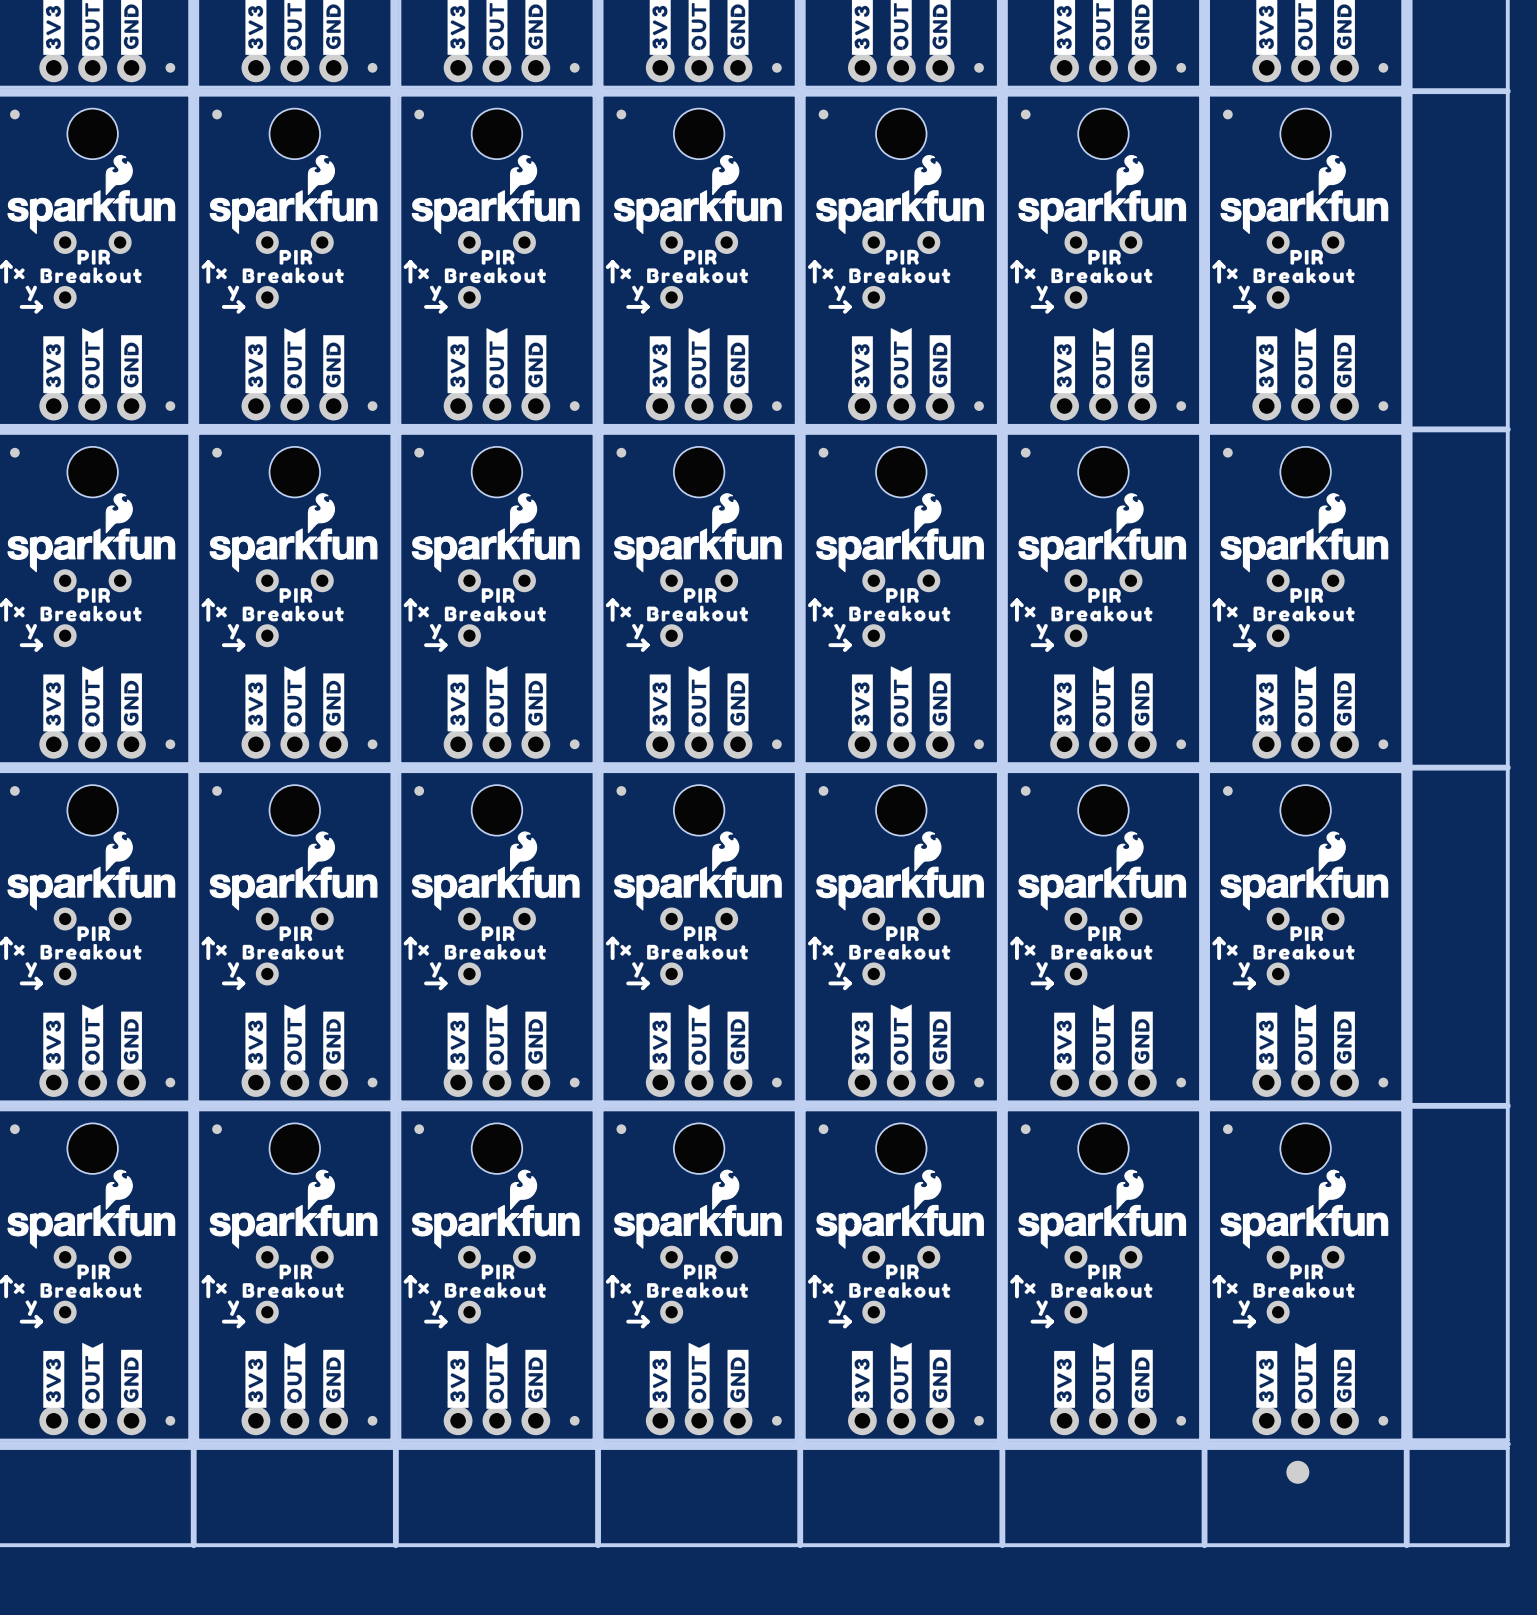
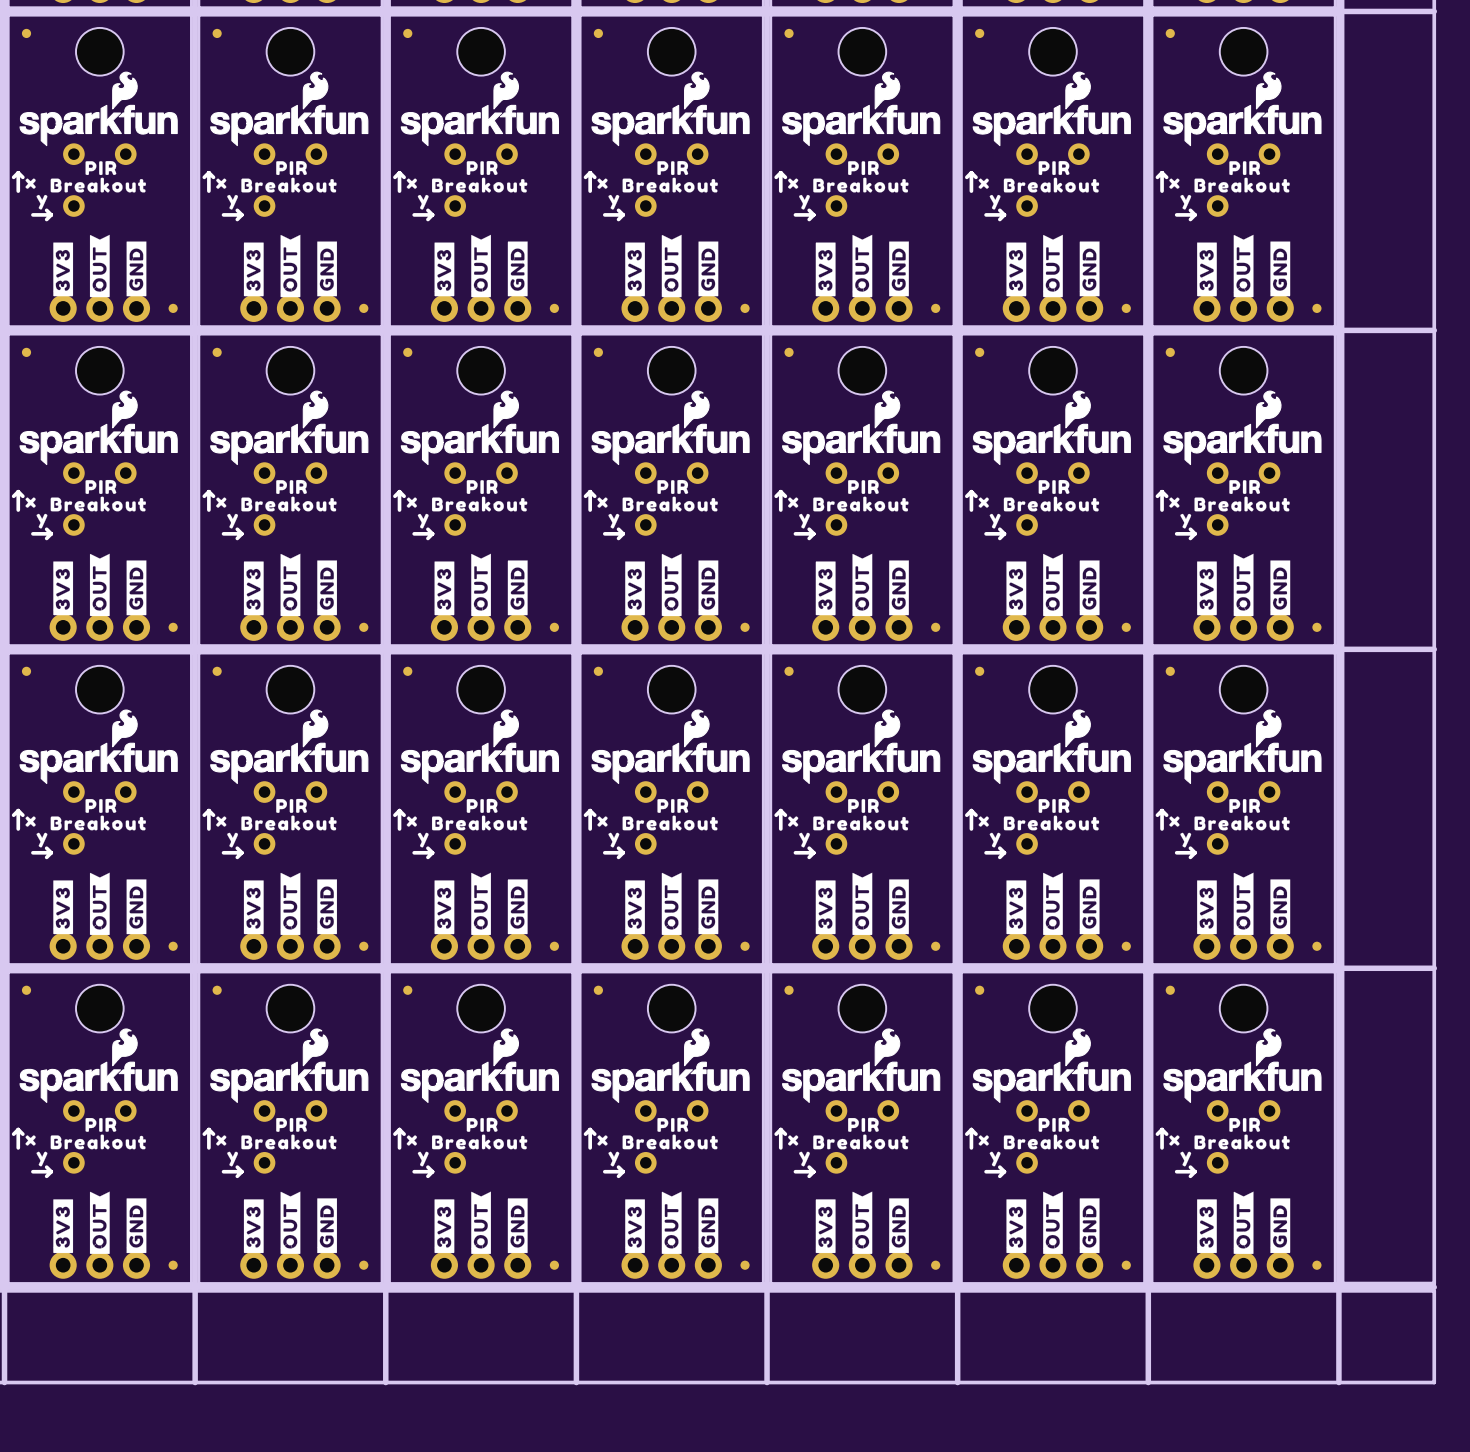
part: (1297, 1472) -> none

